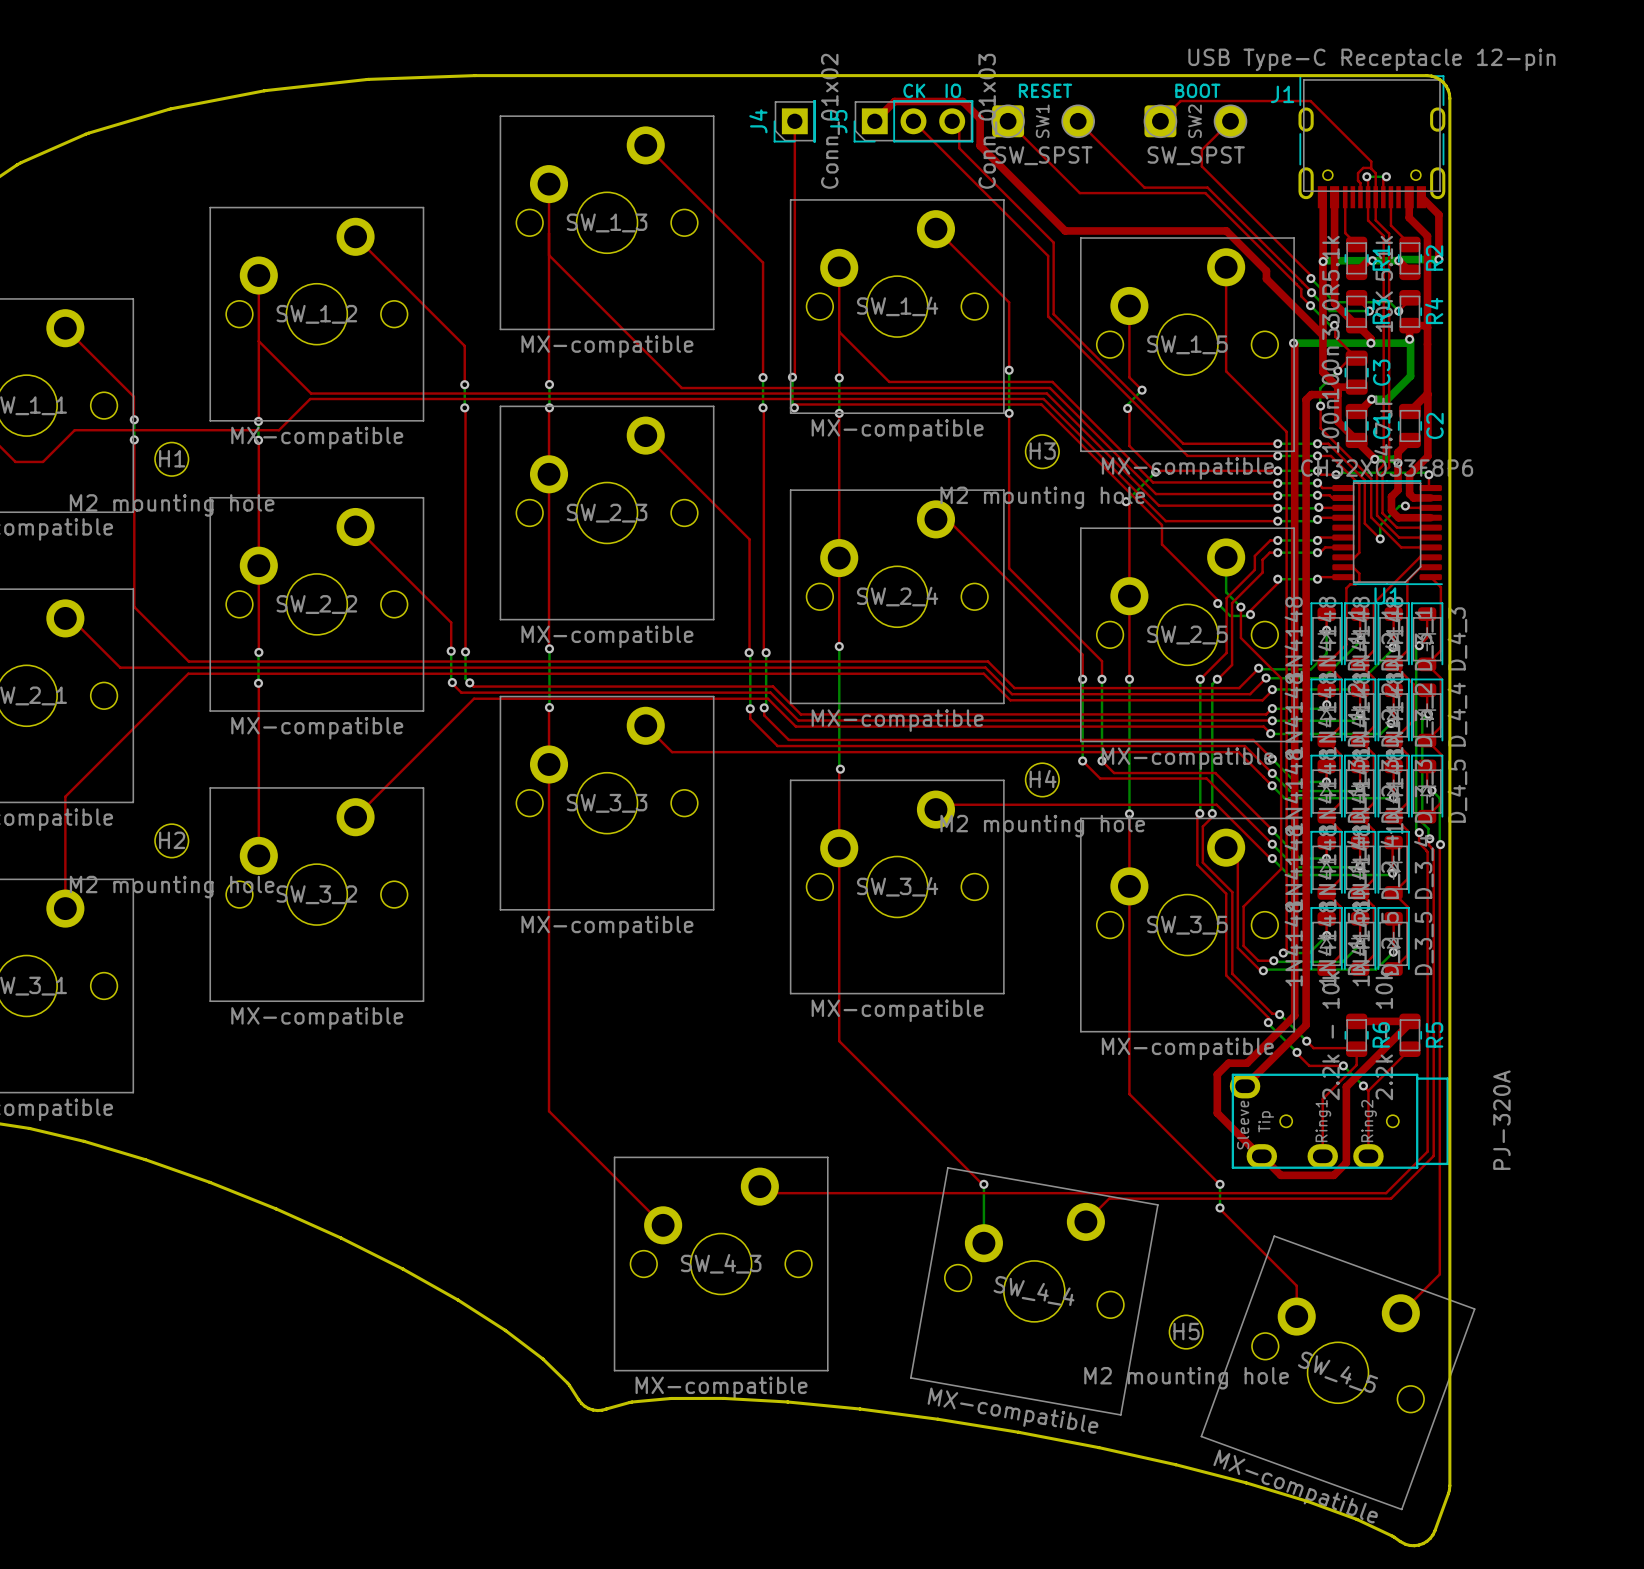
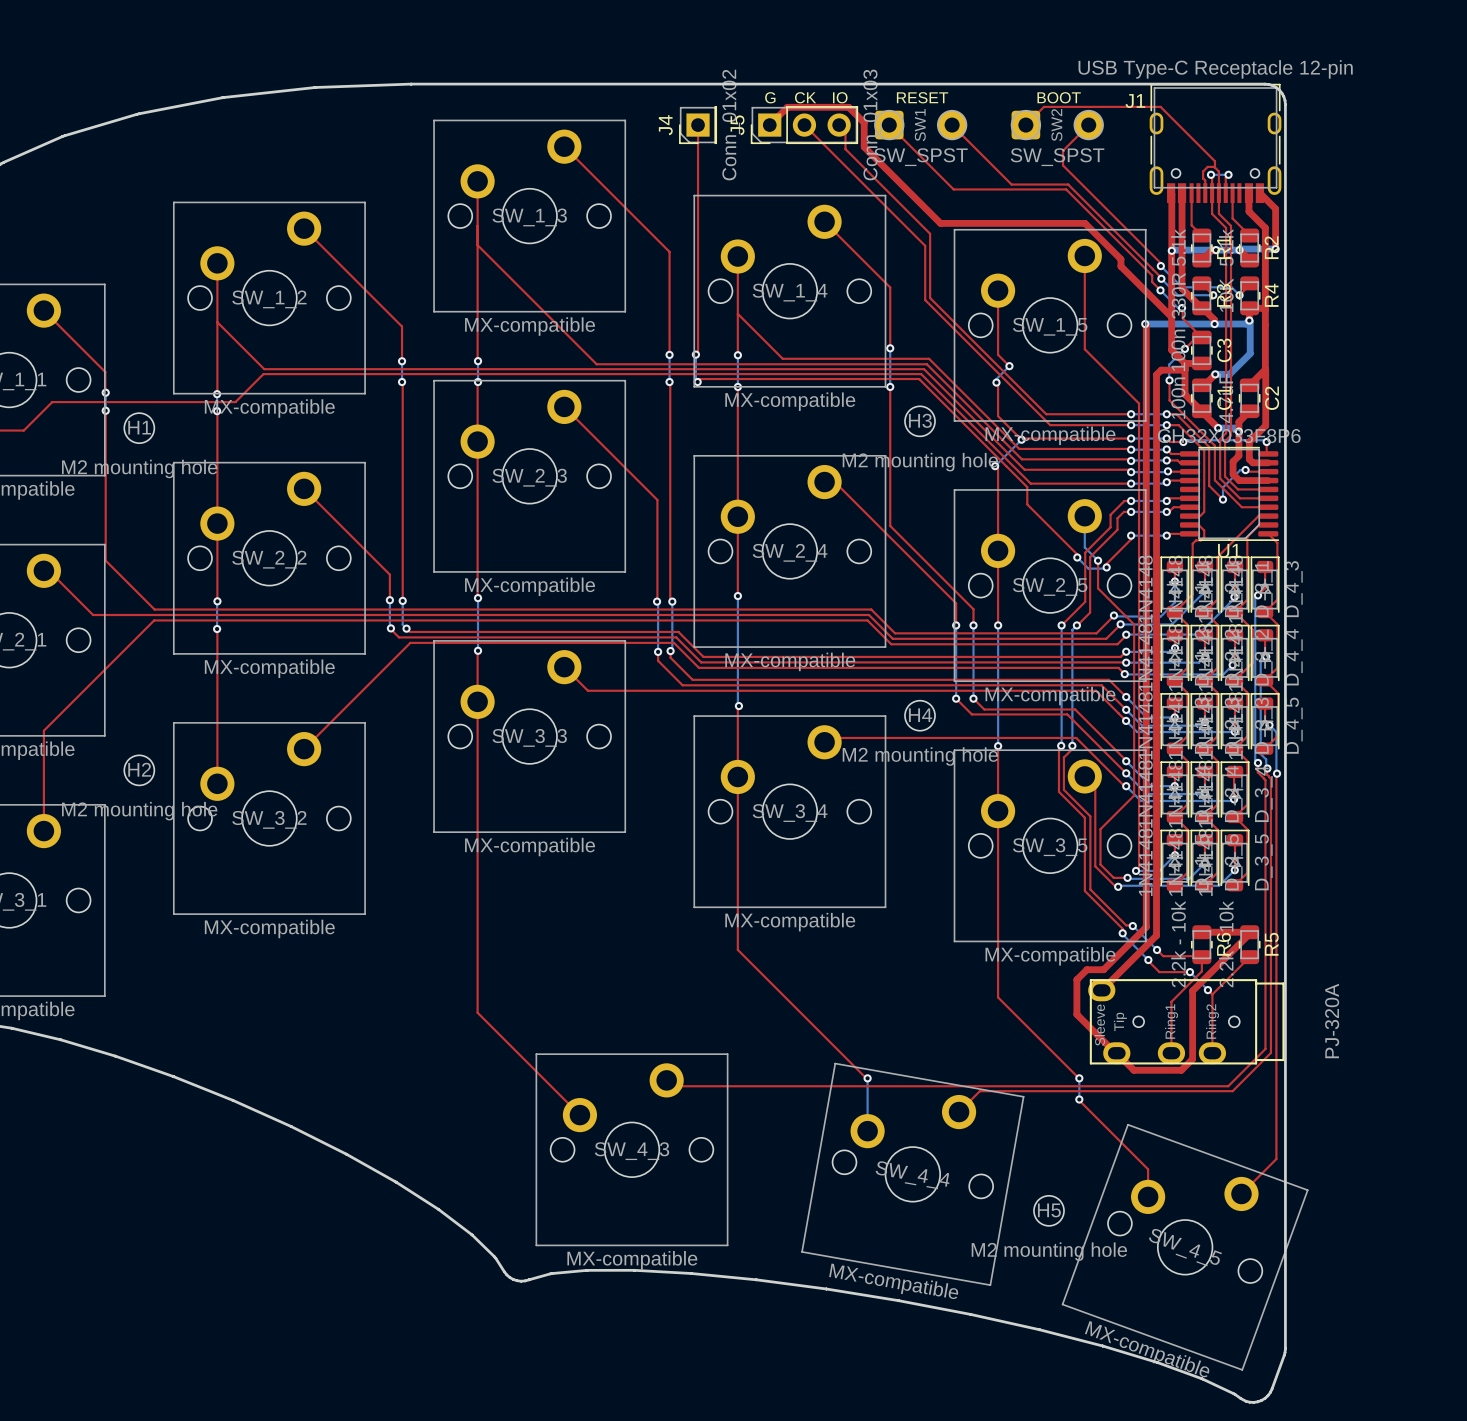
text: none -> G (770, 97)

